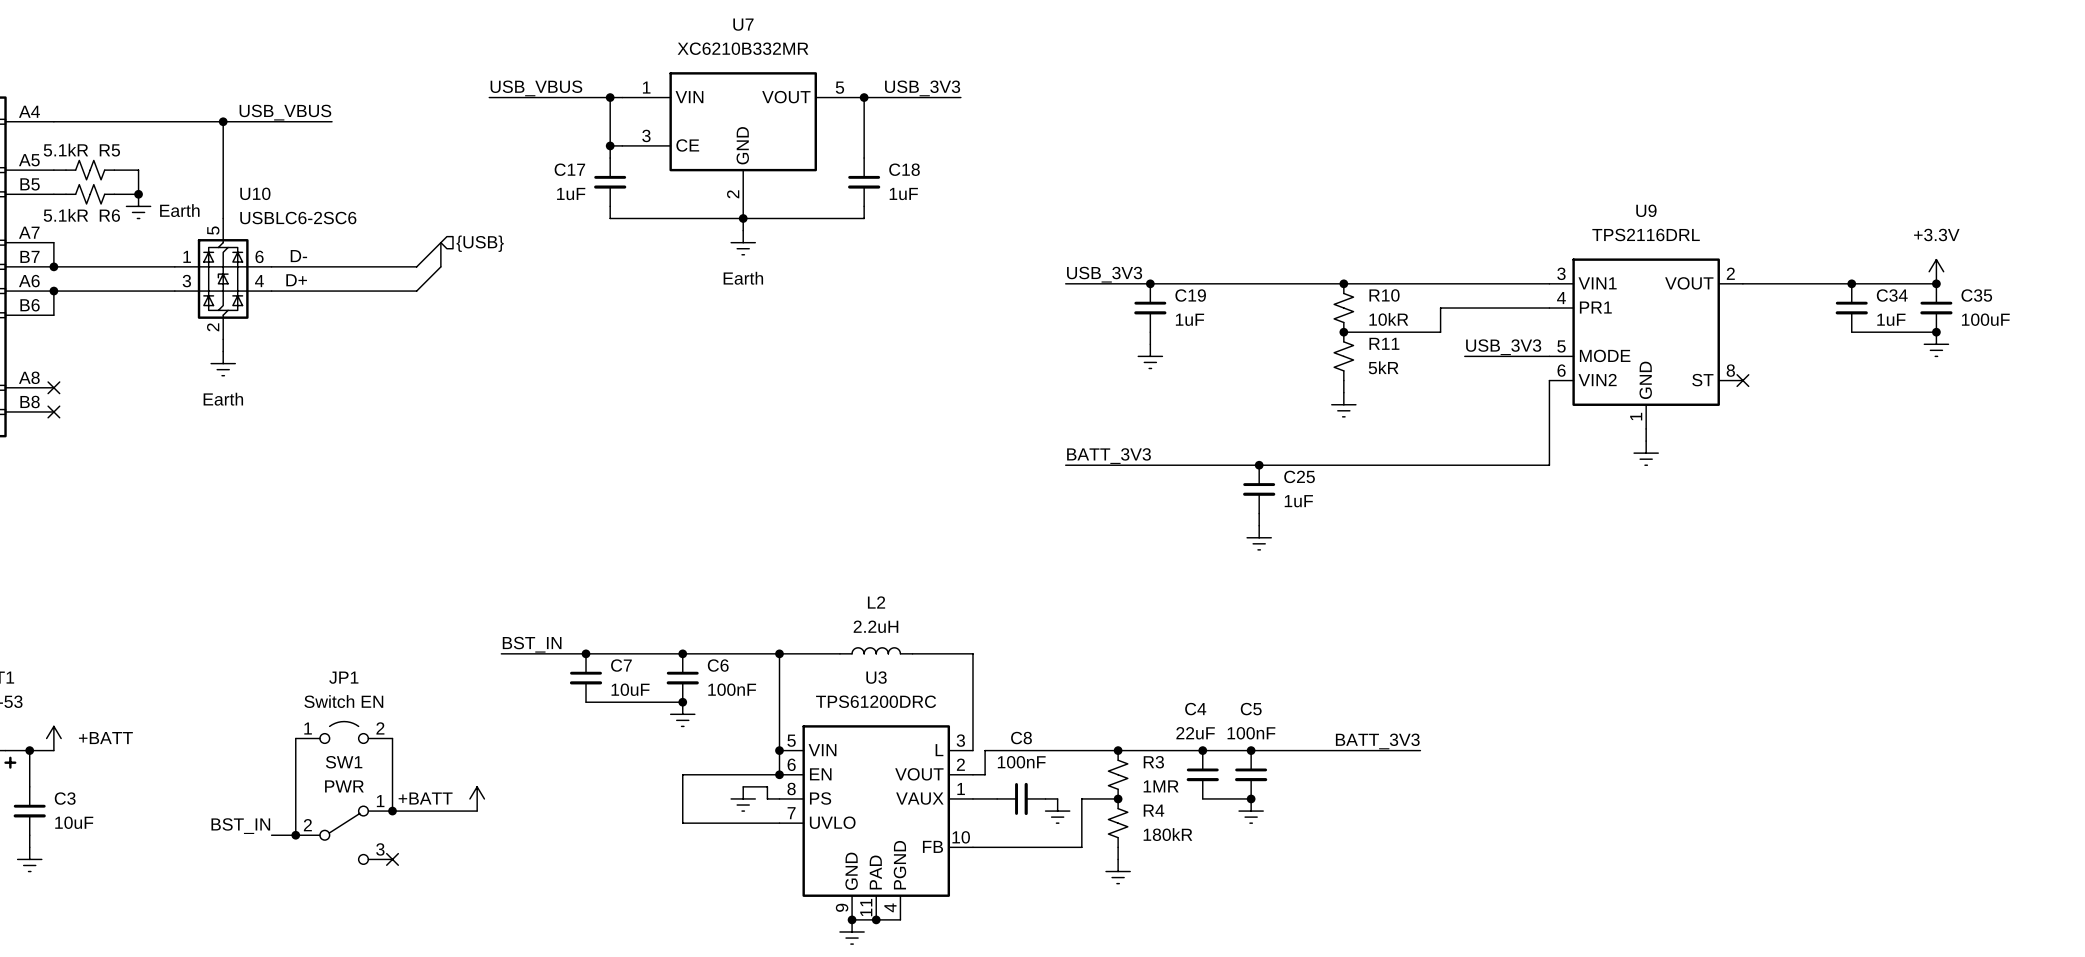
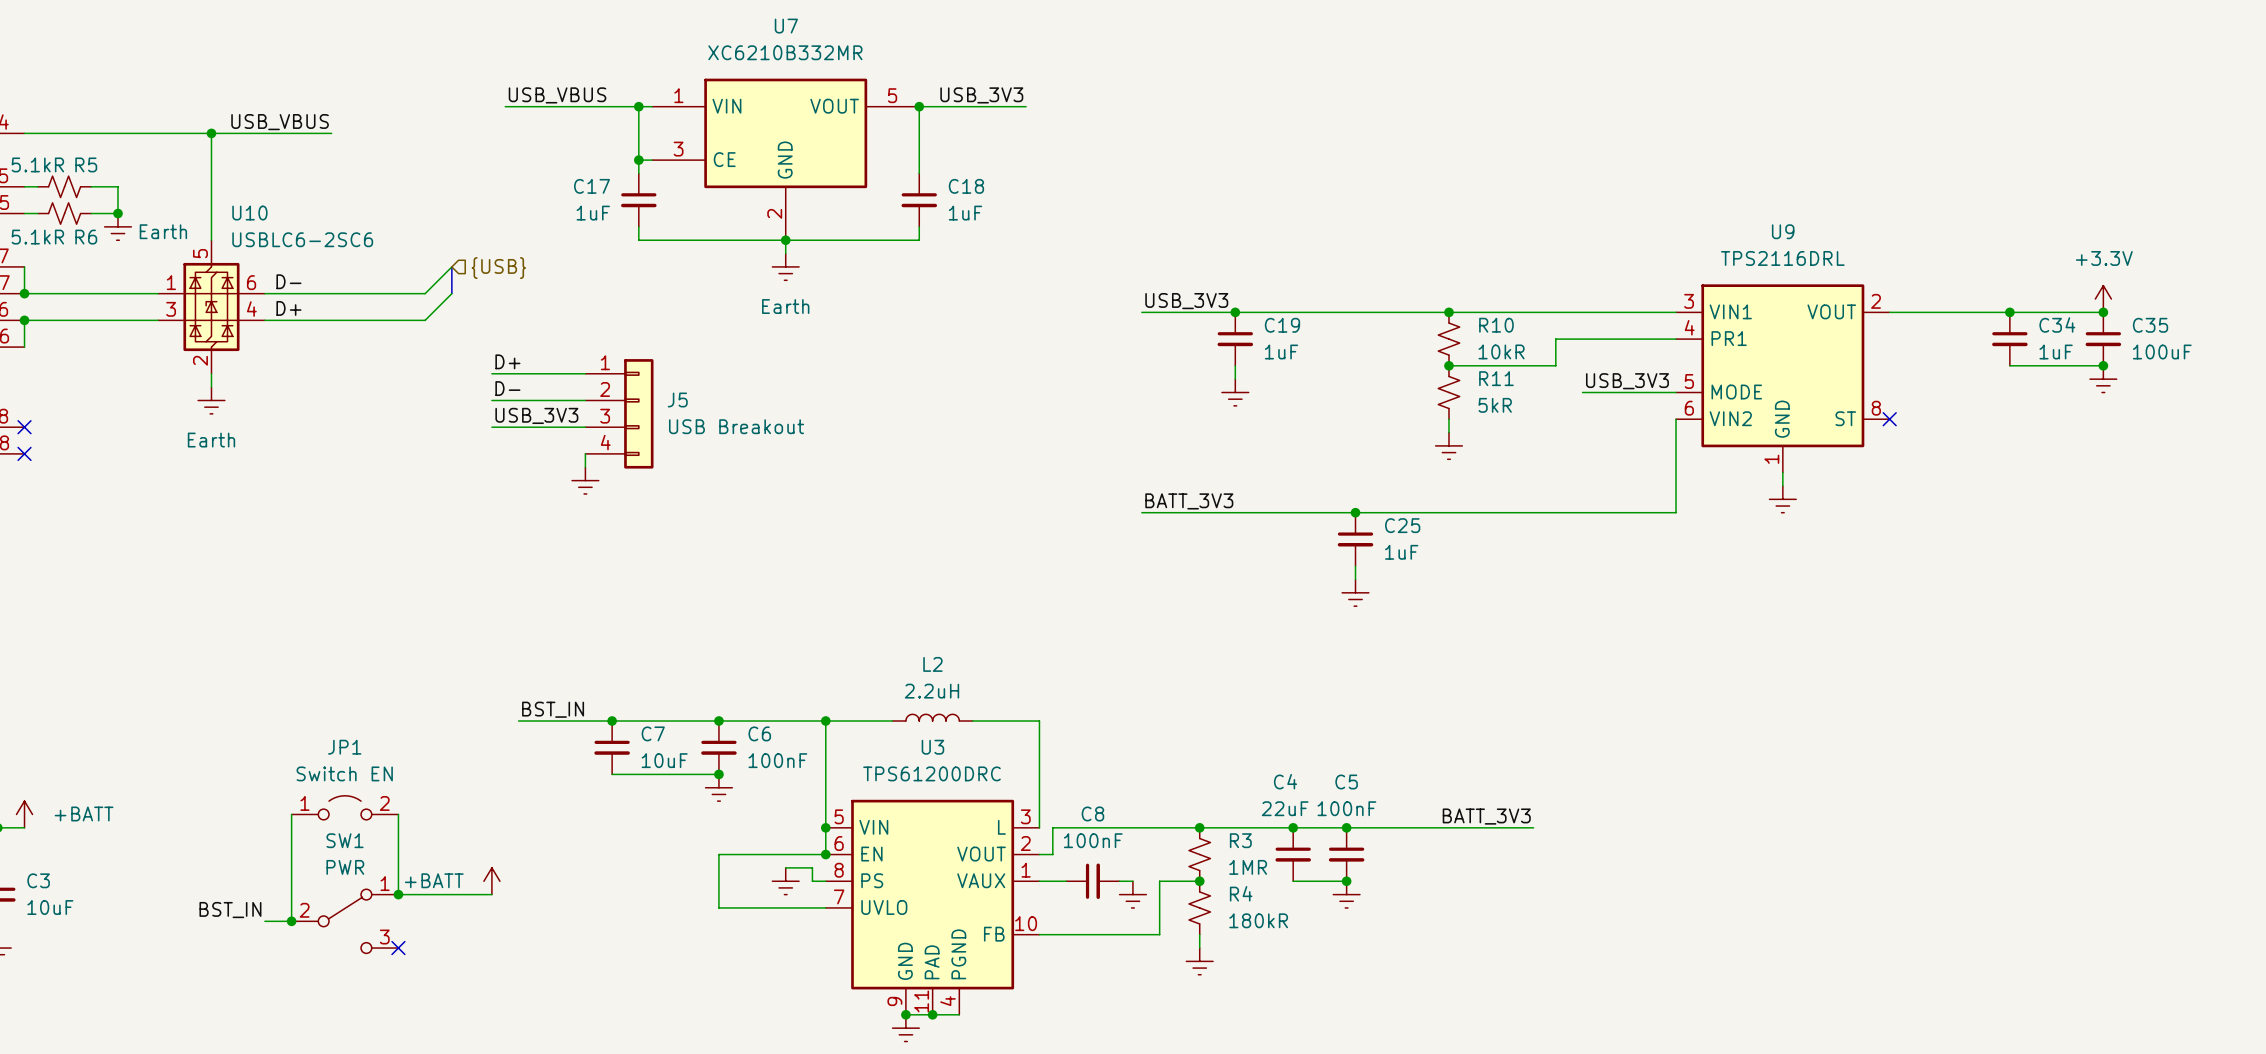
label: none -> D+ (507, 361)
wire: none -> (491, 373) (585, 373)
label: none -> D- (507, 388)
wire: none -> (491, 400) (585, 400)
J5: none -> USB Breakout (619, 413)
label: none -> USB_3V3 (536, 415)
wire: none -> (491, 427) (585, 427)
wire: none -> (585, 453) (585, 467)
power symbol: none -> (585, 480)

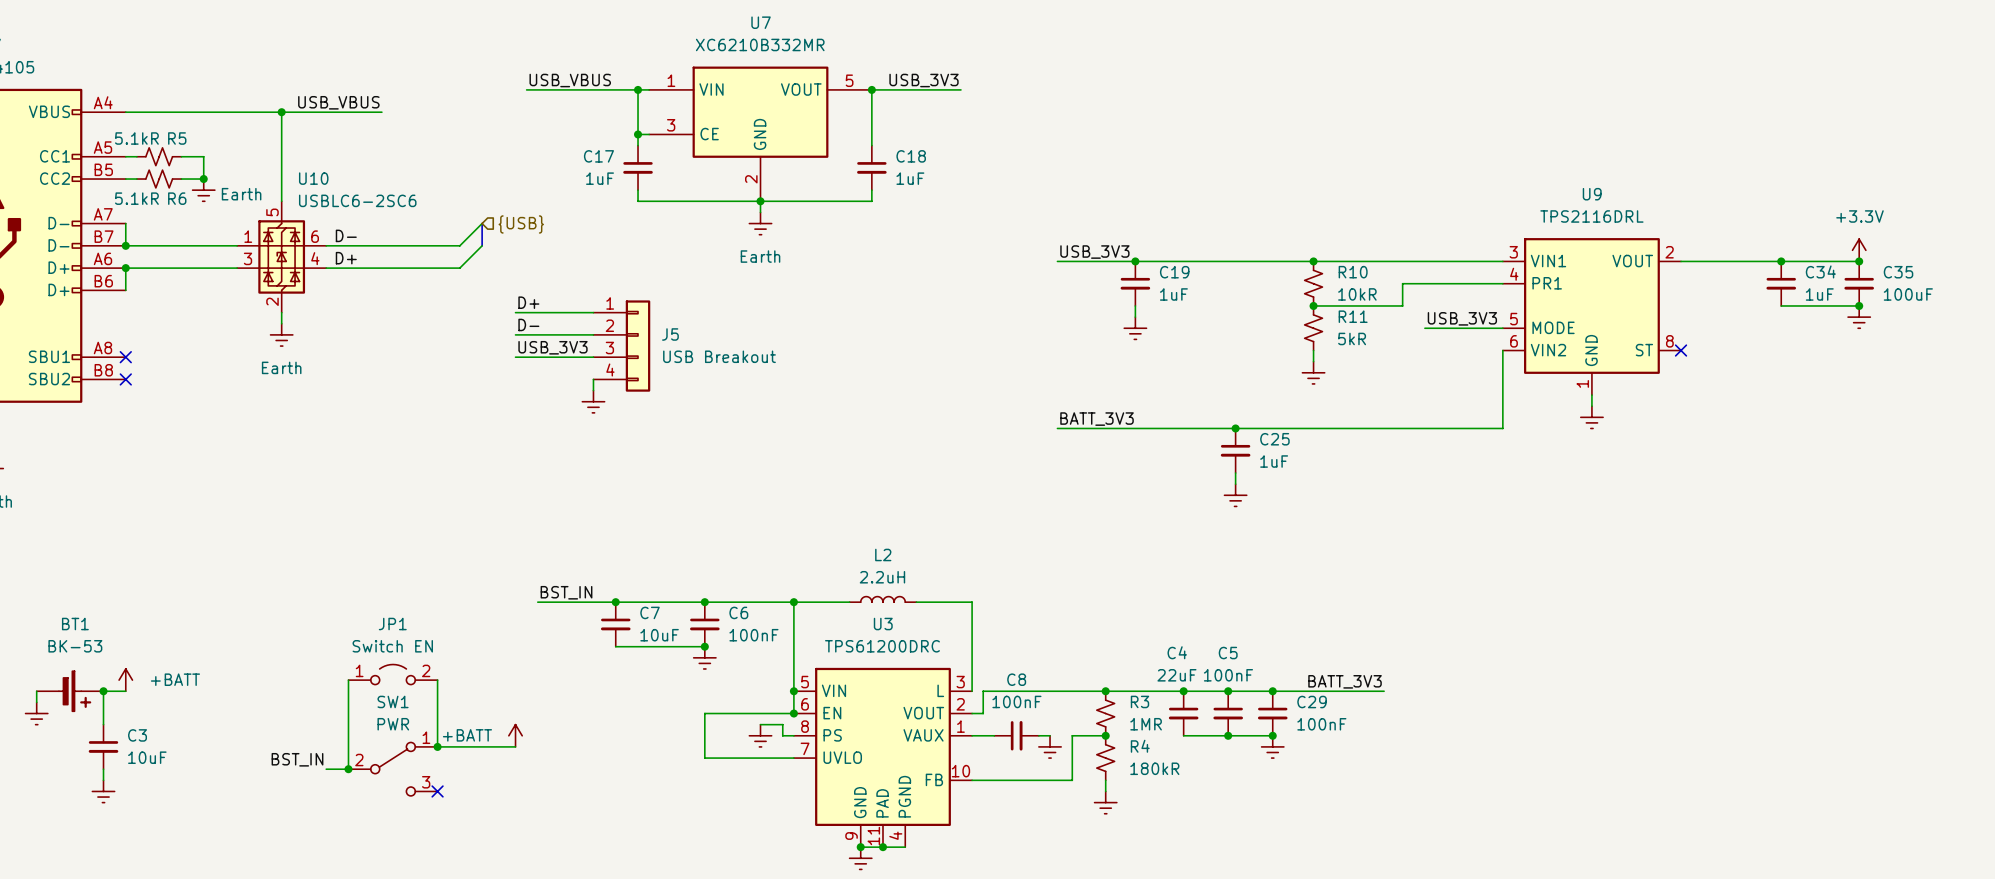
junction: none -> (1272, 691)
C29: none -> 100nF (1272, 713)
wire: none -> (1228, 735) (1272, 735)
junction: none -> (1272, 735)
power symbol position: (1346, 894) -> (1272, 746)

